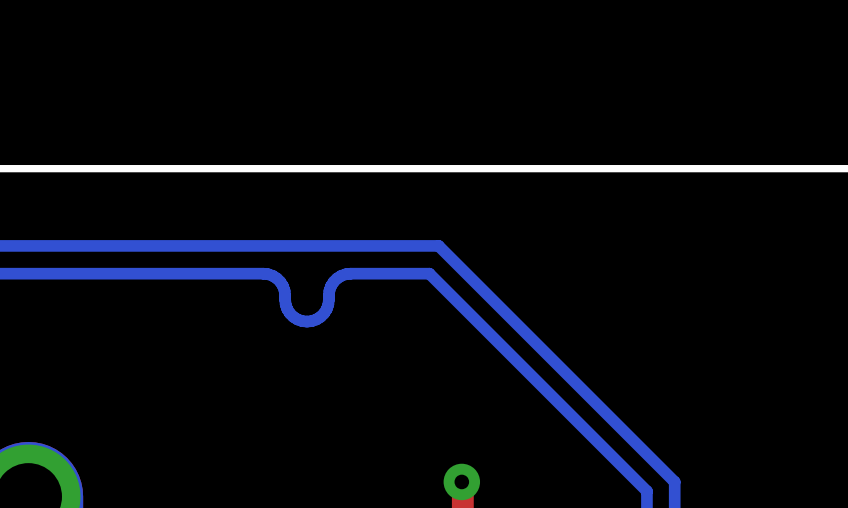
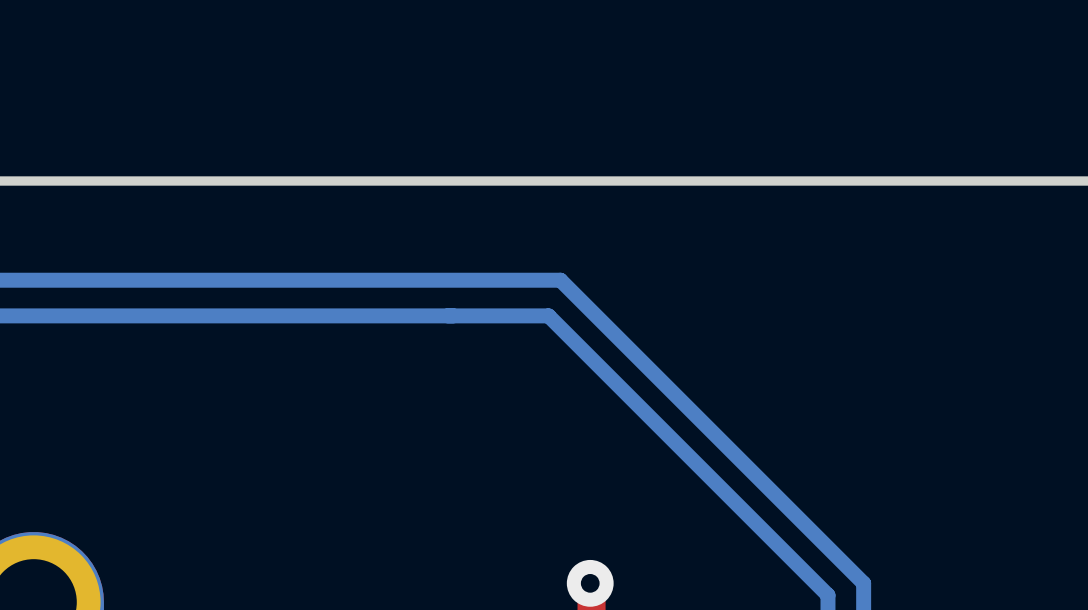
bottom track: (350, 273) (341, 275) (333, 281) (324, 313) (316, 319) (307, 321) (297, 319) (289, 313) (280, 281) (272, 275) (263, 273) -> (447, 315) (335, 315)

